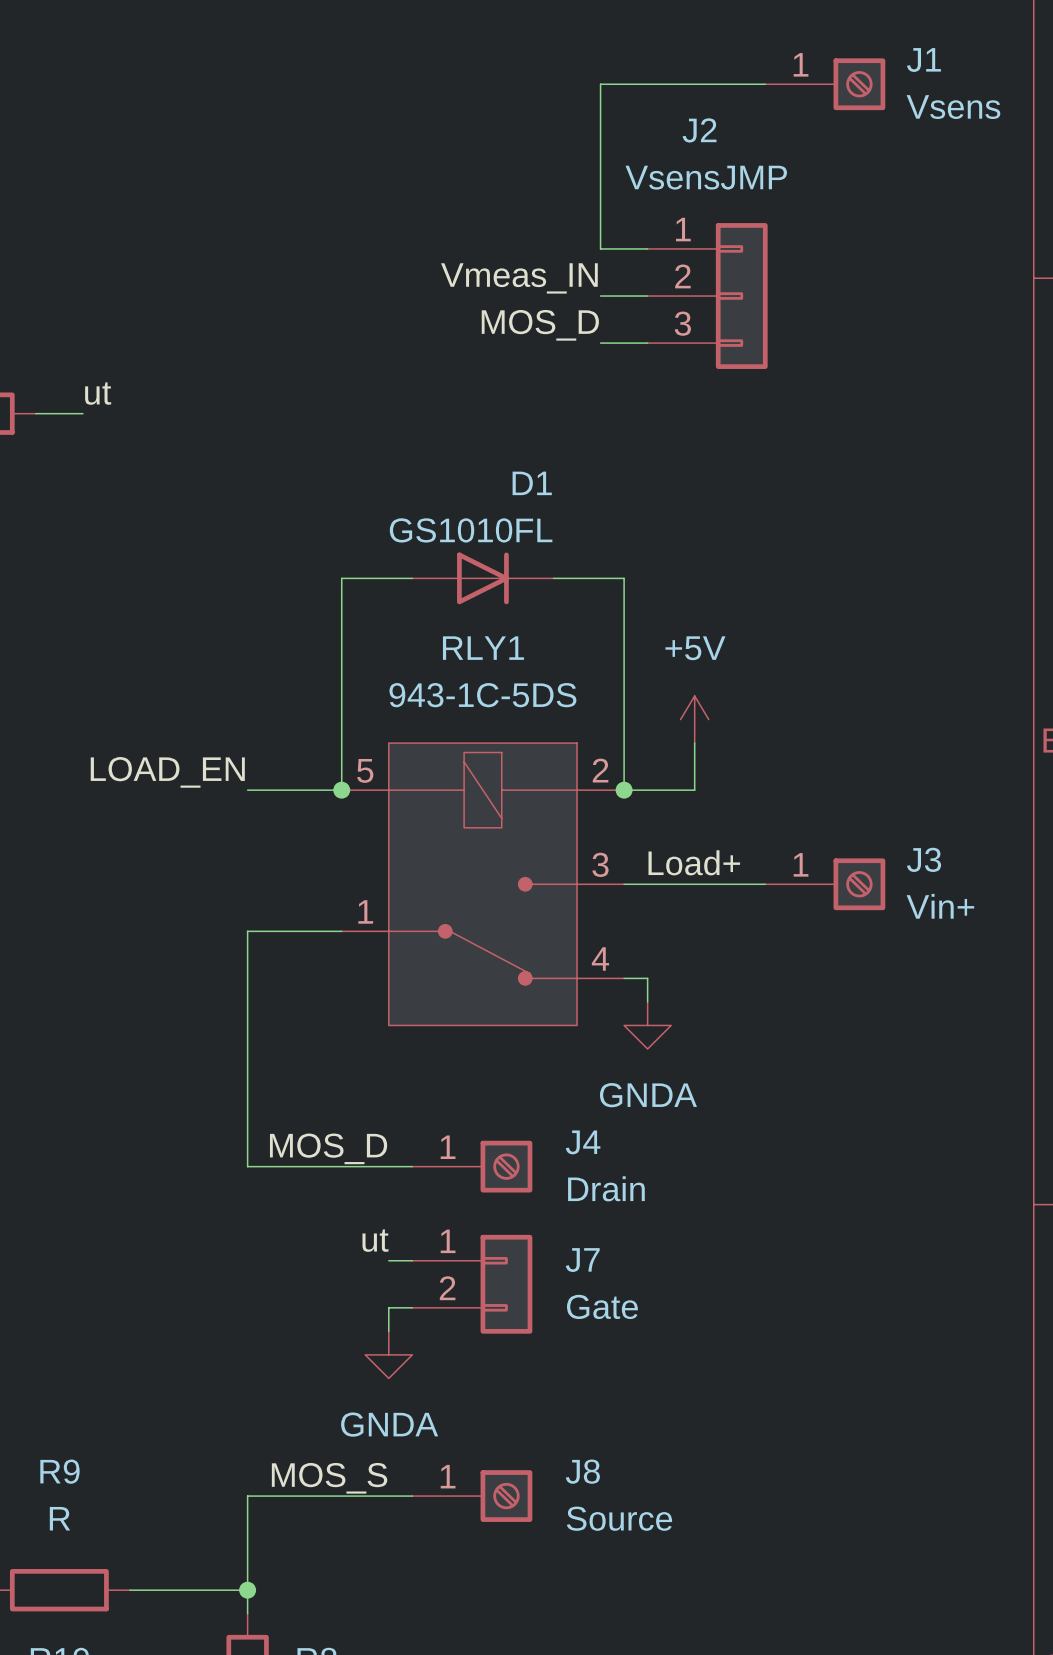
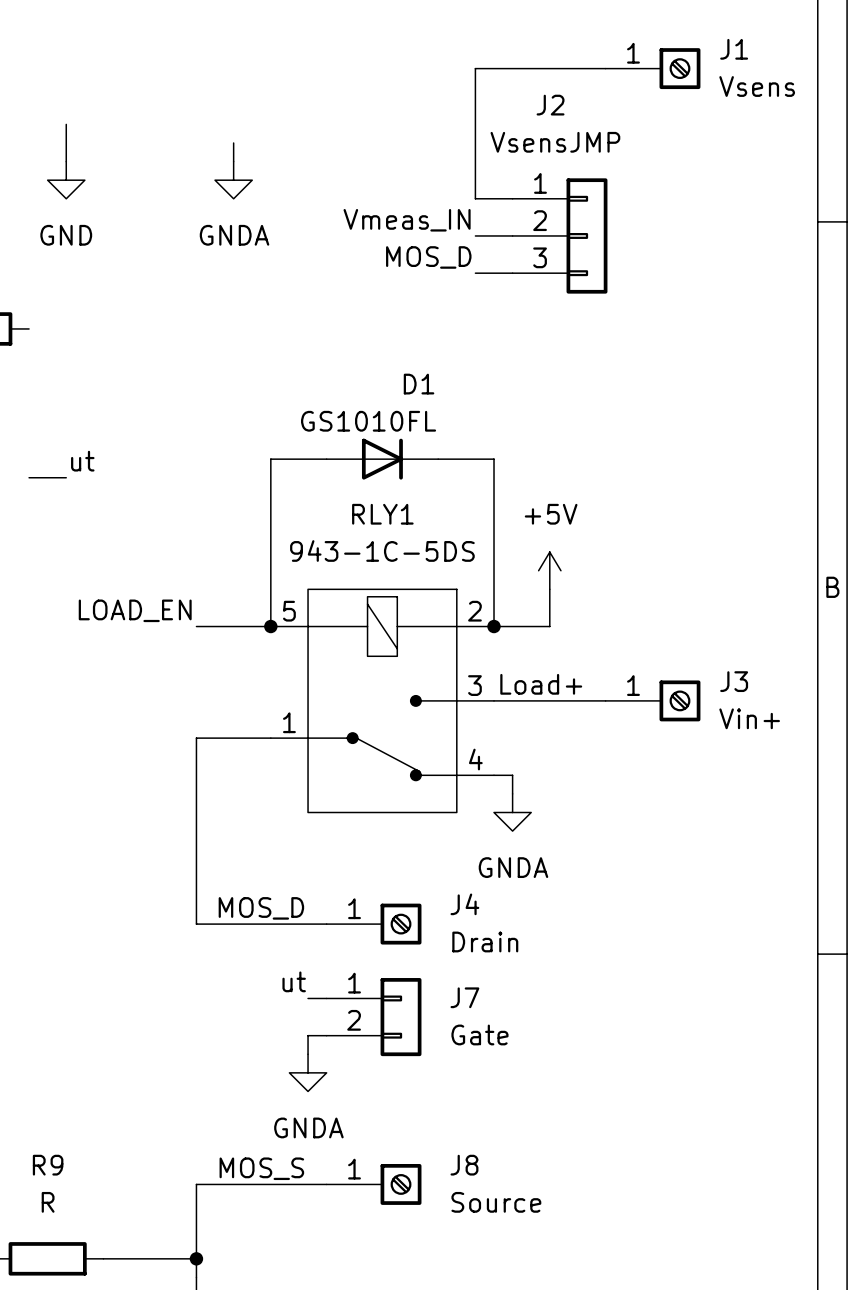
wire: none -> (66, 124) (66, 161)
wire: none -> (233, 142) (233, 161)
power symbol: none -> GND (66, 180)
power symbol: none -> GNDA (233, 180)
label position: ut (98, 393) -> ut (82, 461)
wire: (35, 413) (82, 413) -> (29, 477) (66, 477)

